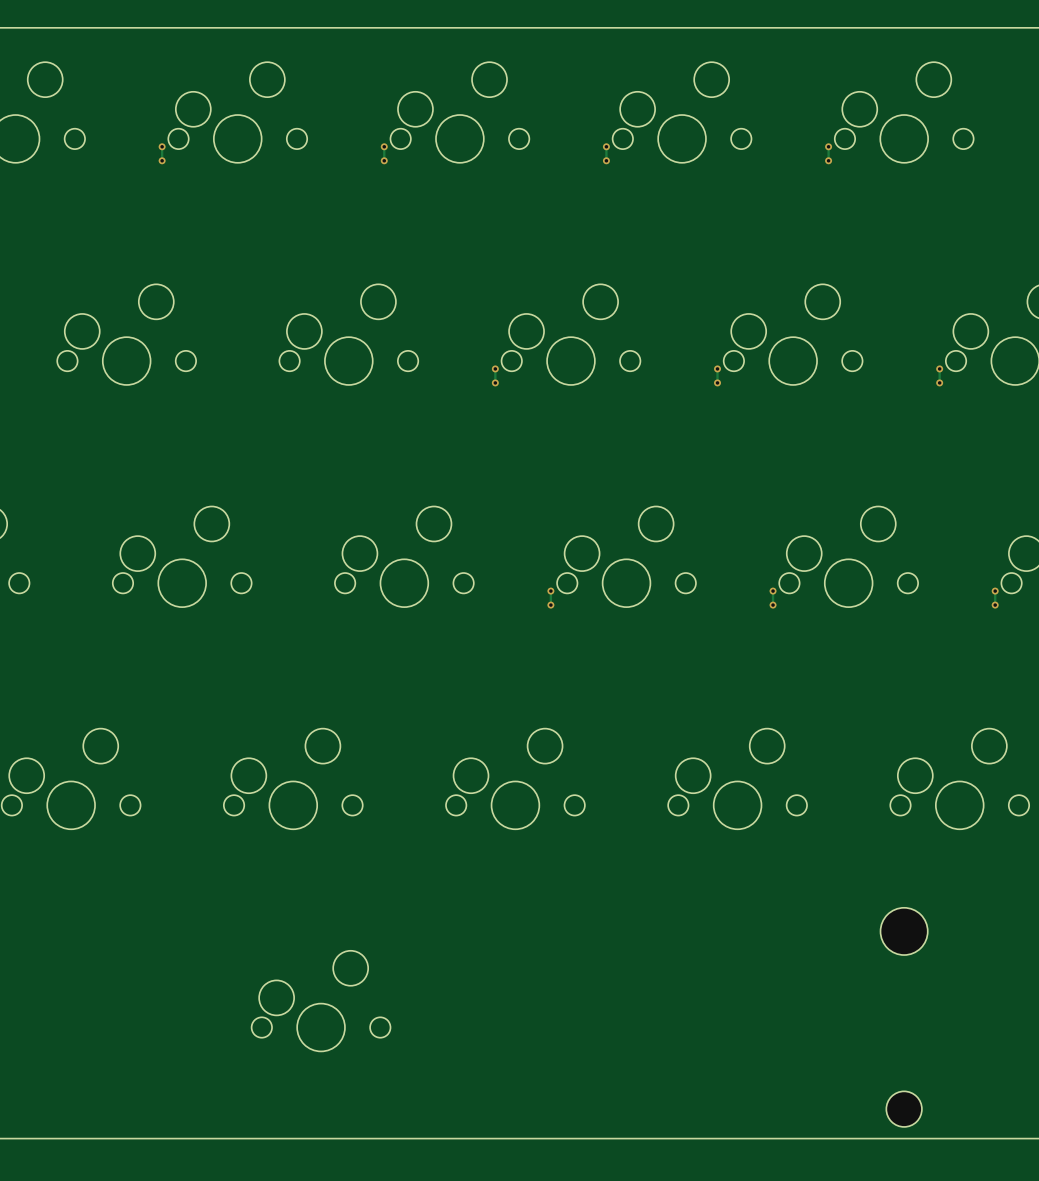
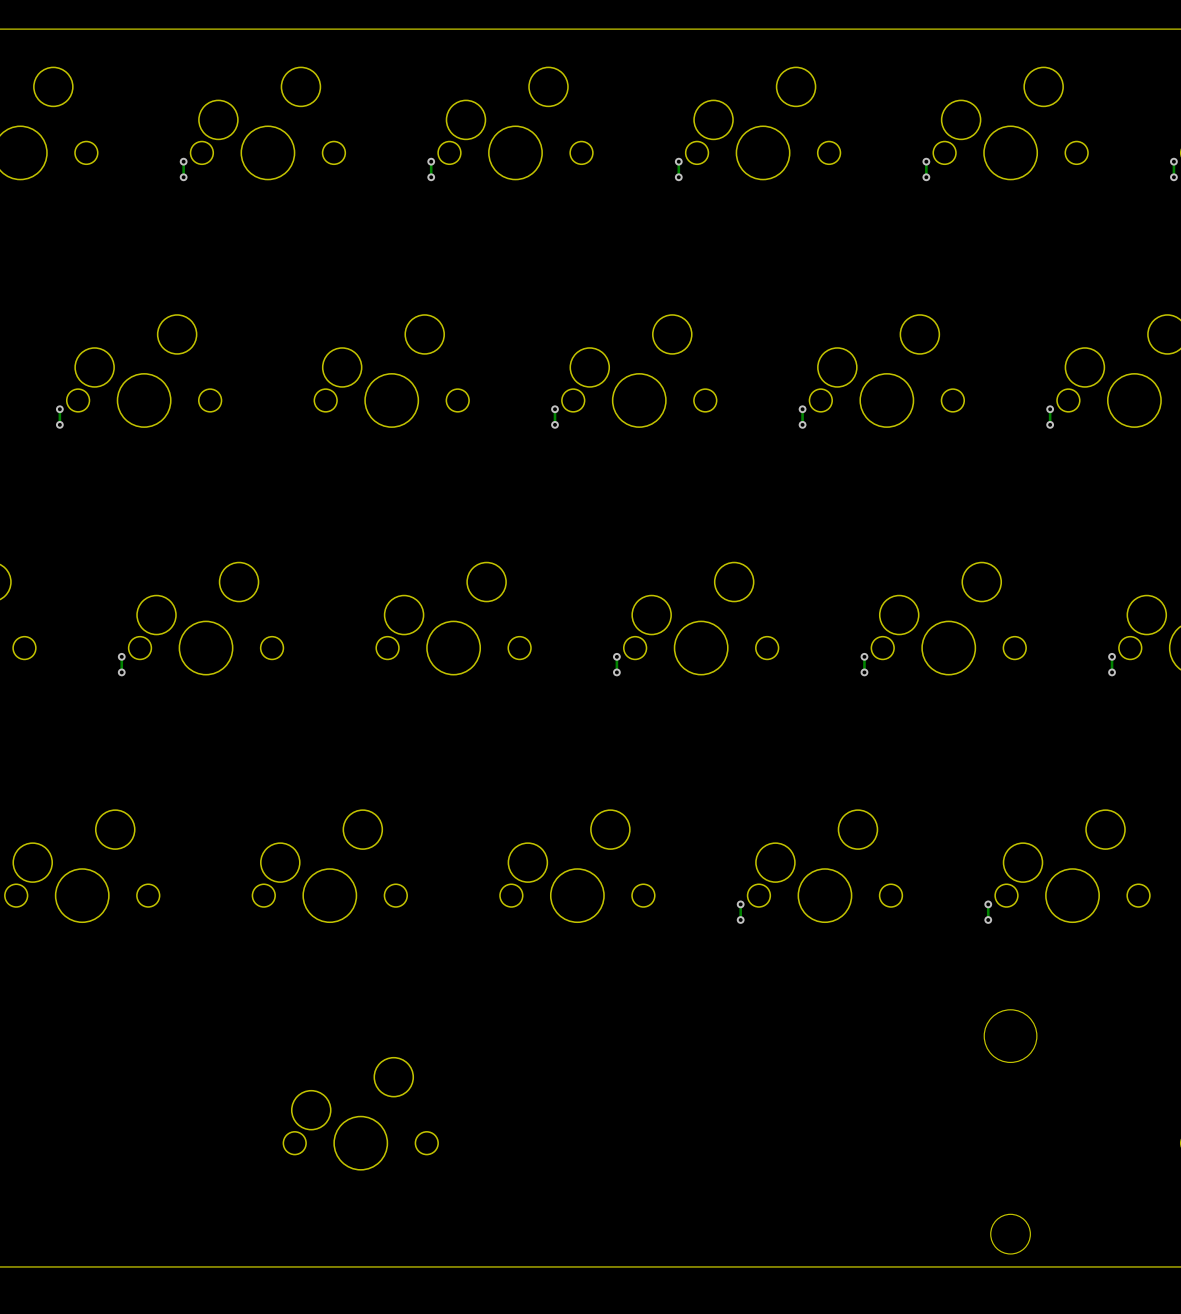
track: none -> (59, 409) (59, 424)
via: none -> (59, 409)
via: none -> (59, 424)
track: none -> (121, 656) (121, 672)
via: none -> (121, 656)
via: none -> (121, 672)
track: none -> (740, 904) (740, 919)
via: none -> (740, 904)
track: none -> (988, 904) (988, 919)
via: none -> (988, 904)
via: none -> (740, 919)
via: none -> (988, 919)

